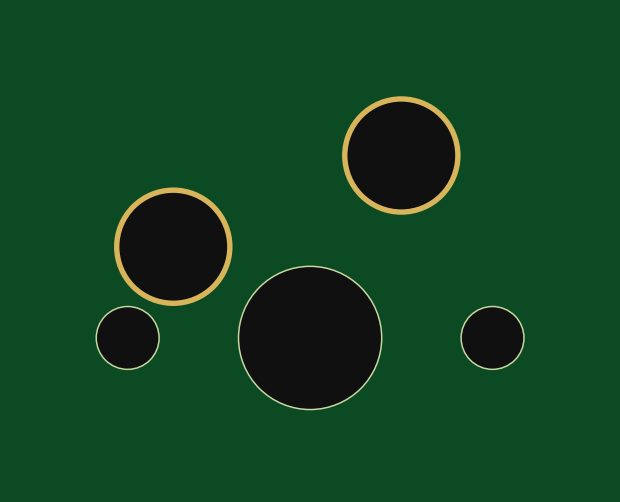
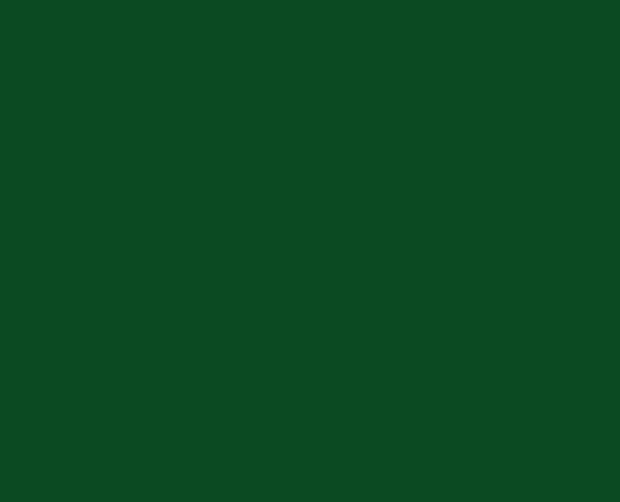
part: (310, 252) -> none

